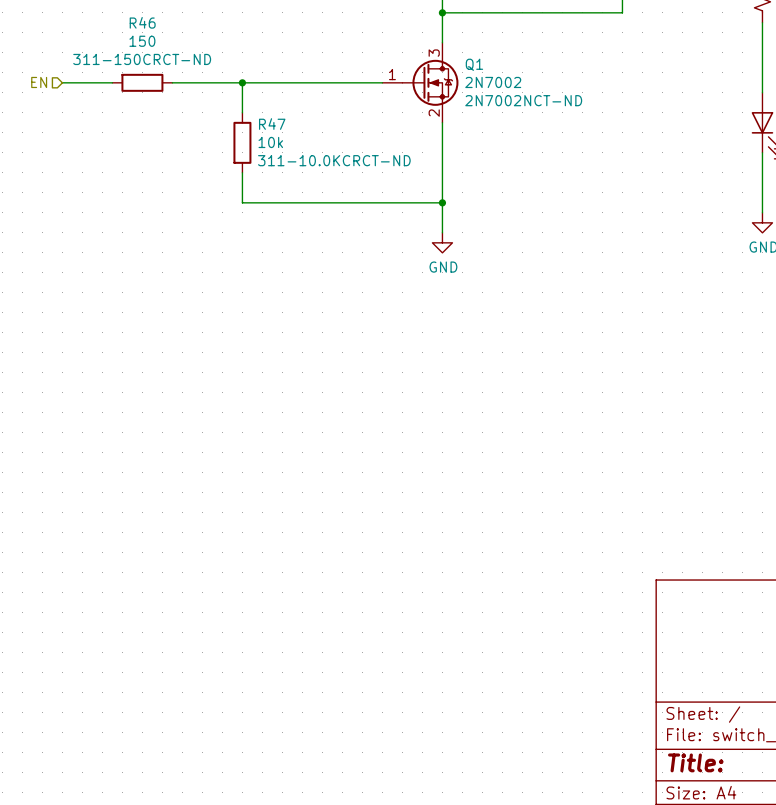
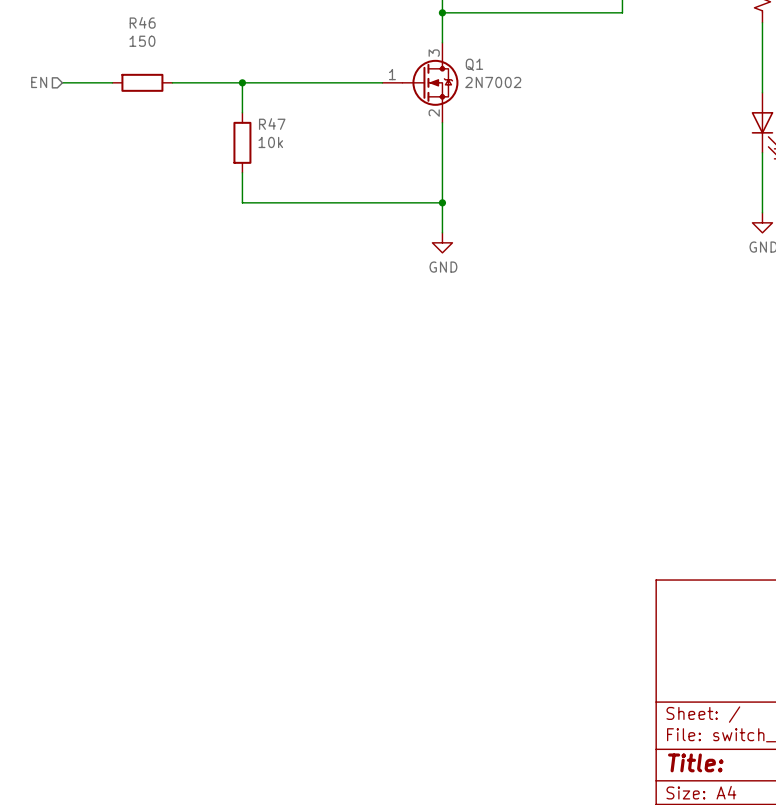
R46 text: 311-150CRCT-ND (142, 59) -> none
Q1 text: 2N7002NCT-ND (523, 100) -> none
R47 text: 311-10.0KCRCT-ND (334, 160) -> none

